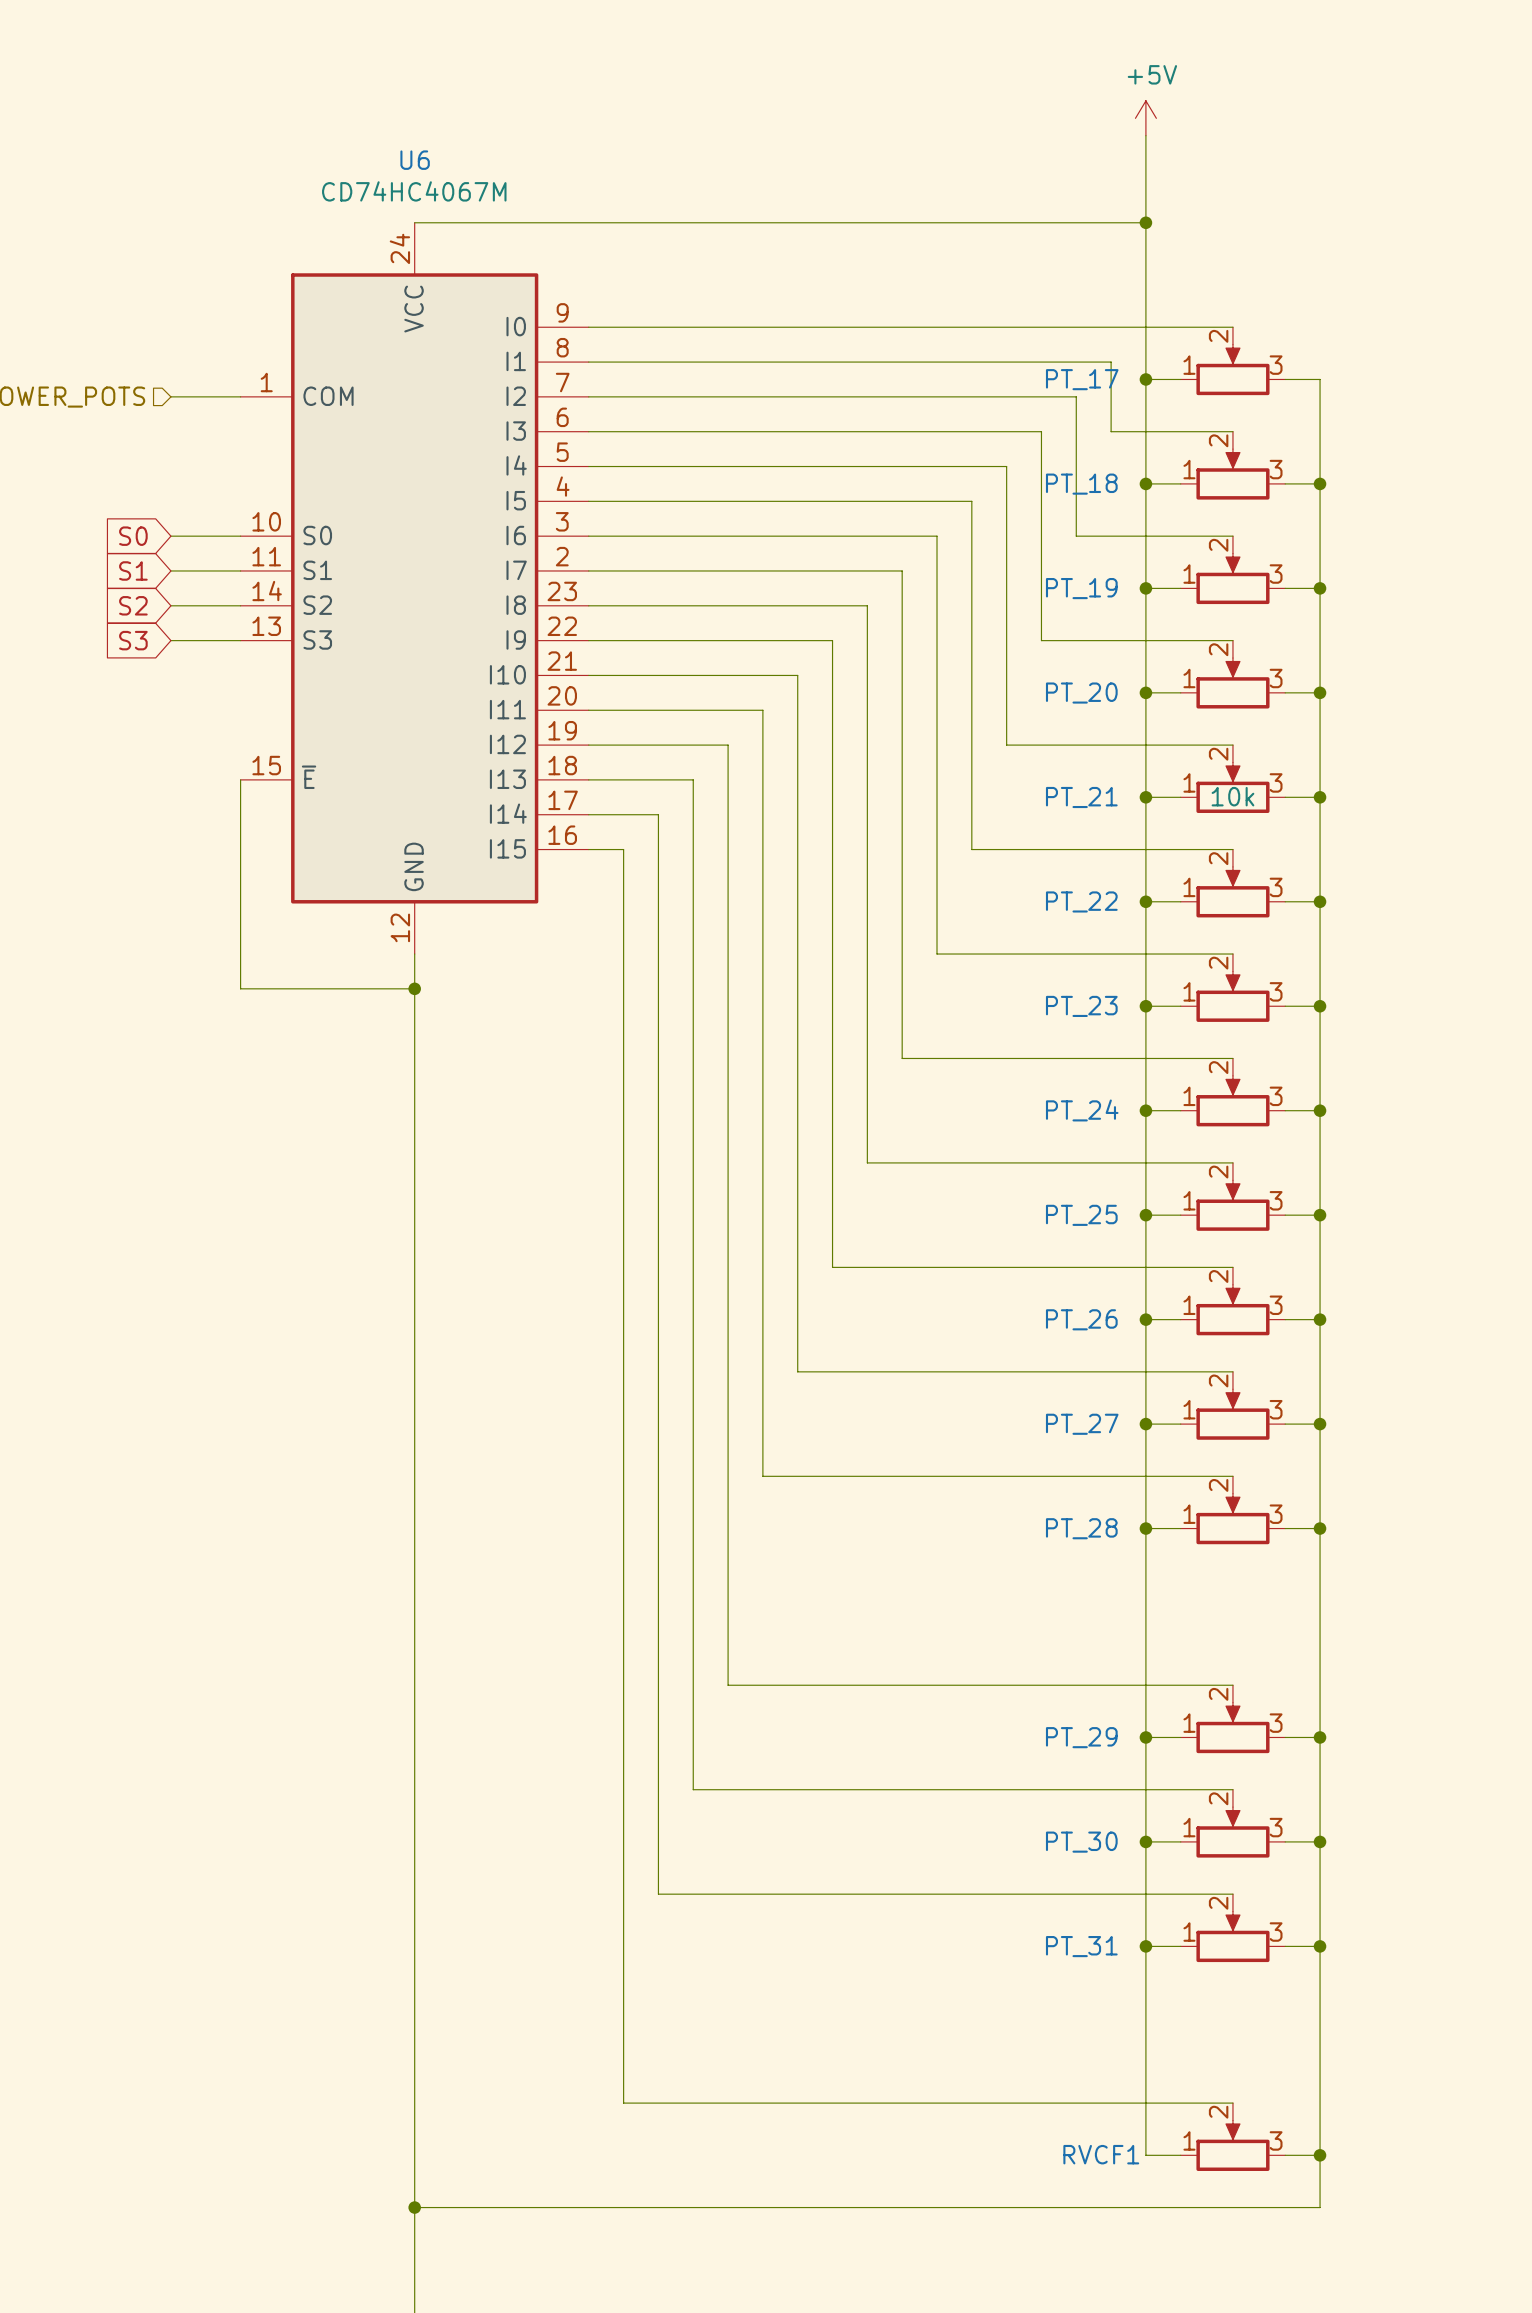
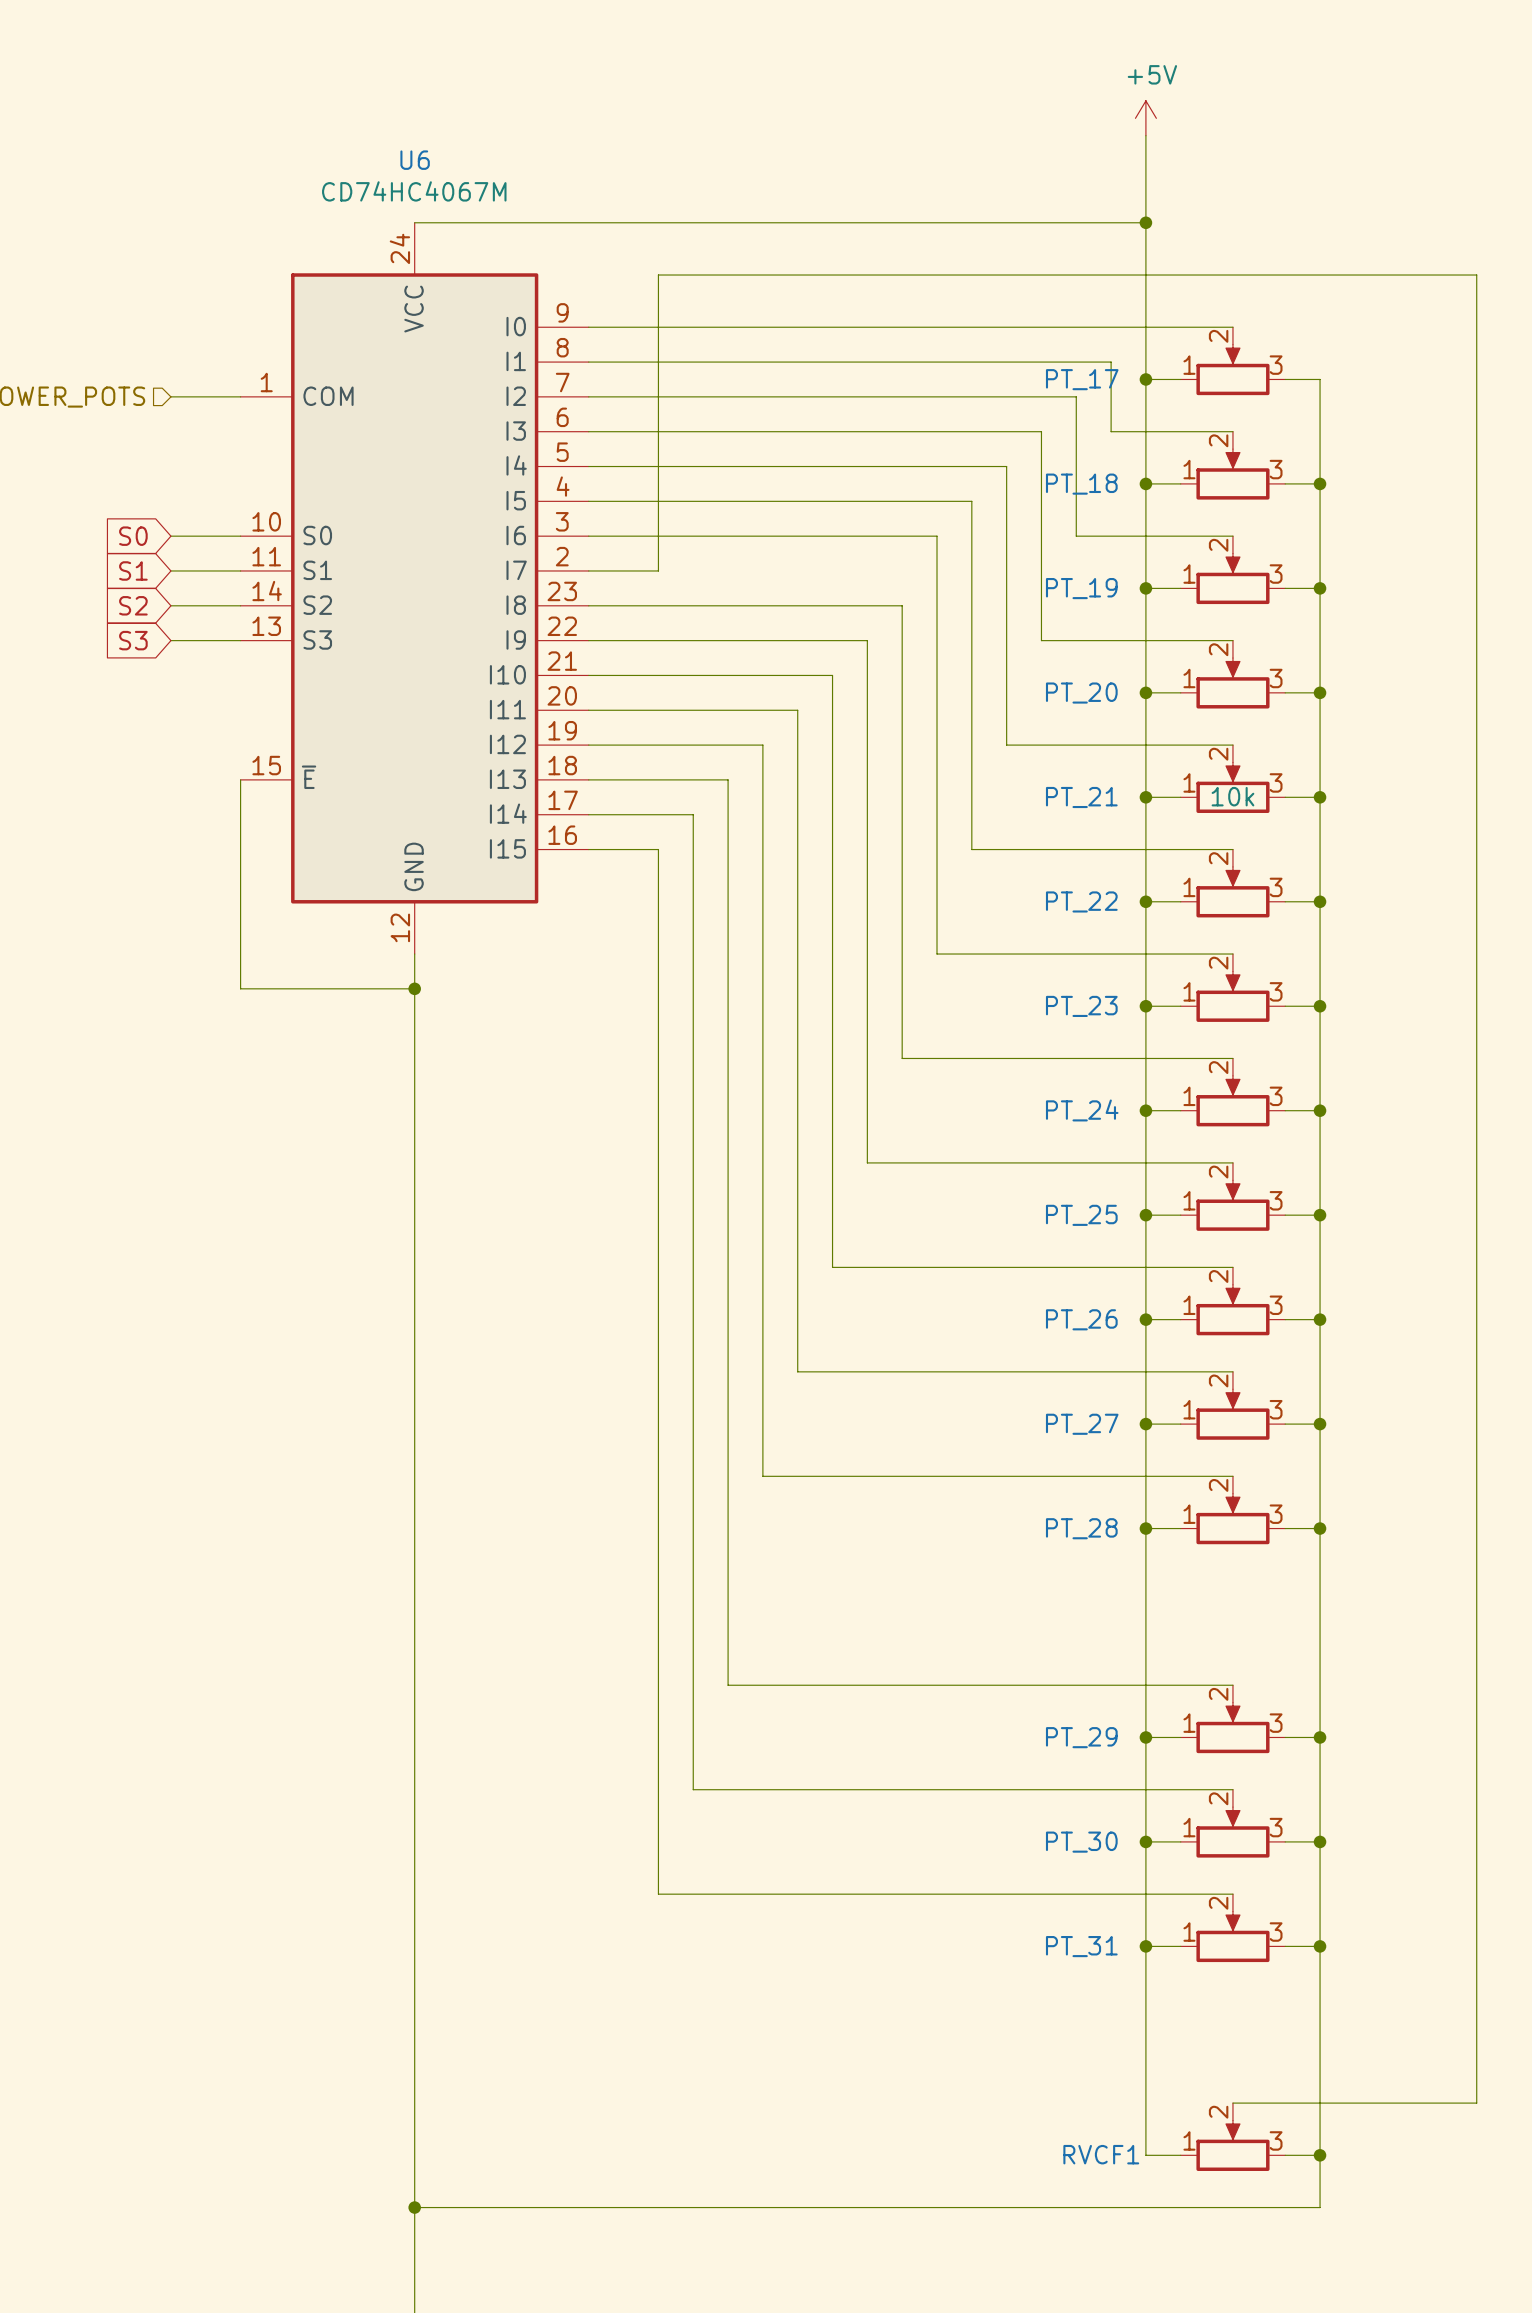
wire: (658, 570) (902, 570) (902, 605) -> none
wire: (867, 605) (867, 640) -> (867, 605) (902, 605)
wire: (832, 640) (832, 675) -> (832, 640) (867, 640)
wire: (797, 675) (797, 710) -> (797, 675) (832, 675)
wire: (762, 710) (762, 745) -> (762, 710) (797, 710)
wire: (728, 745) (728, 779) -> (728, 745) (762, 745)
wire: (693, 779) (693, 814) -> (693, 779) (728, 779)
wire: (658, 814) (658, 849) -> (658, 814) (693, 814)
wire: (623, 849) (623, 2103) (1232, 2103) -> (658, 570) (658, 275) (1476, 275) (1476, 2103) (1232, 2103)
wire: none -> (623, 849) (658, 849)

